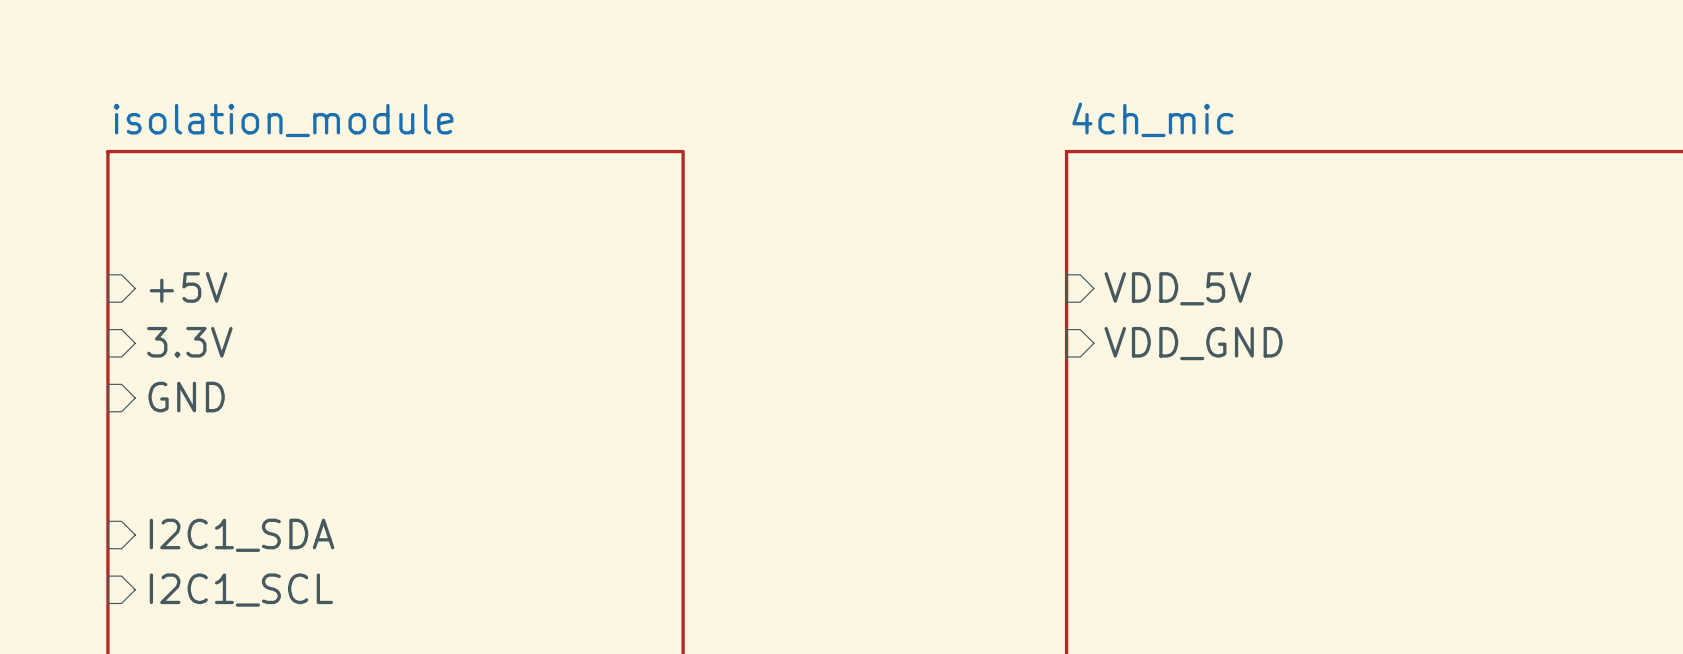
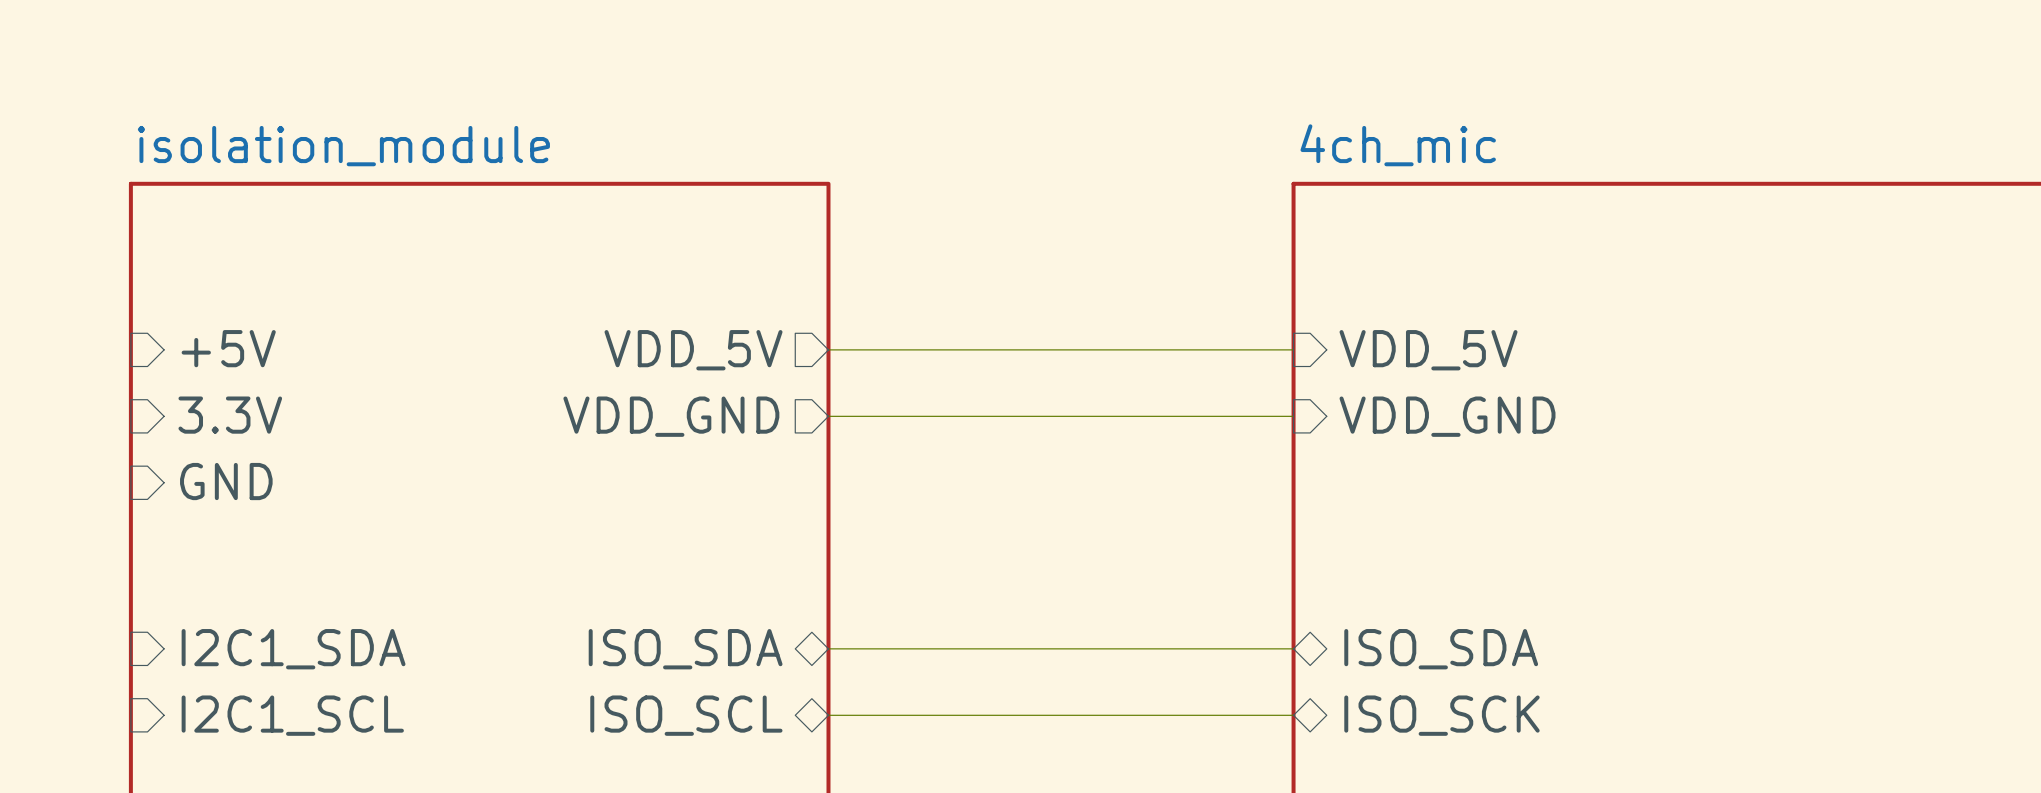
sheet pin: none -> VDD_5V (693, 350)
wire: none -> (828, 349) (1293, 349)
sheet pin: none -> VDD_GND (671, 416)
wire: none -> (828, 416) (1293, 416)
sheet pin: none -> ISO_SDA (685, 649)
wire: none -> (828, 648) (1293, 648)
sheet pin: none -> ISO_SDA (1441, 649)
wire: none -> (828, 715) (1293, 715)
sheet pin: none -> ISO_SCL (686, 715)
sheet pin: none -> ISO_SCK (1441, 715)

